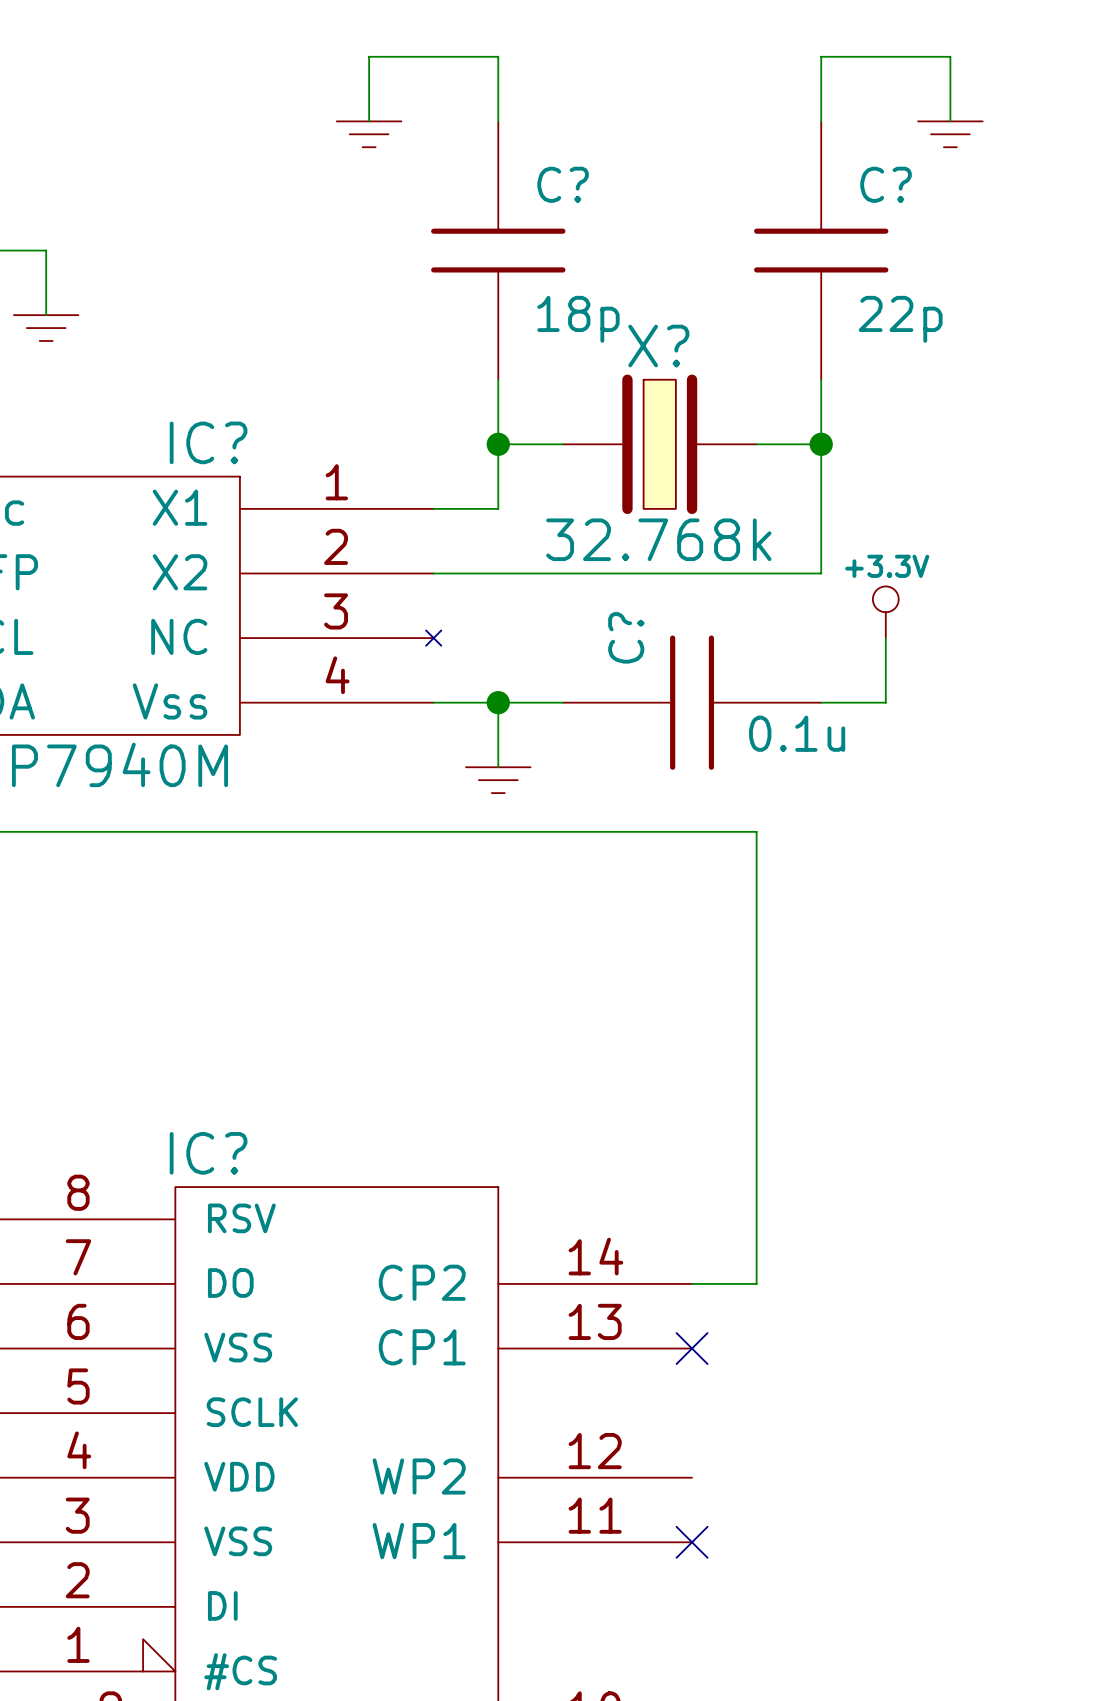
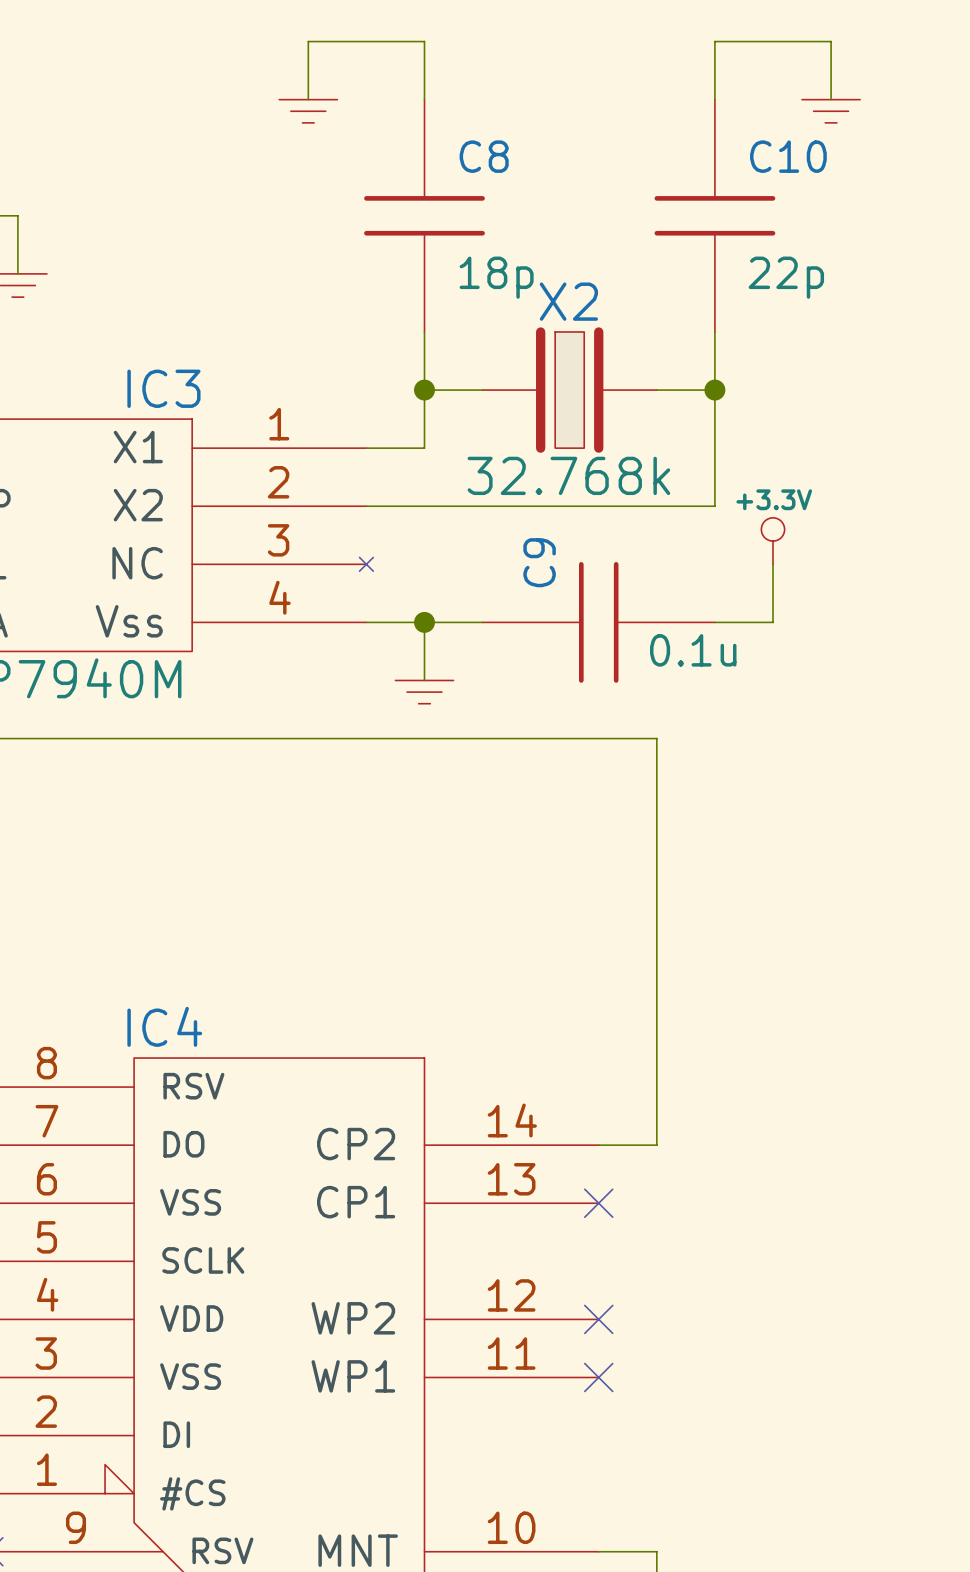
C? name: C? (563, 184) -> C8 (484, 156)
C? name: C? (886, 184) -> C10 (788, 156)
X? name: X? (658, 345) -> X2 (568, 301)
IC? name: IC? (208, 442) -> IC3 (163, 388)
C? name: C? (626, 637) -> C9 (539, 562)
IC? name: IC? (208, 1153) -> IC4 (164, 1026)
no-connect mark: none -> (598, 1319)

